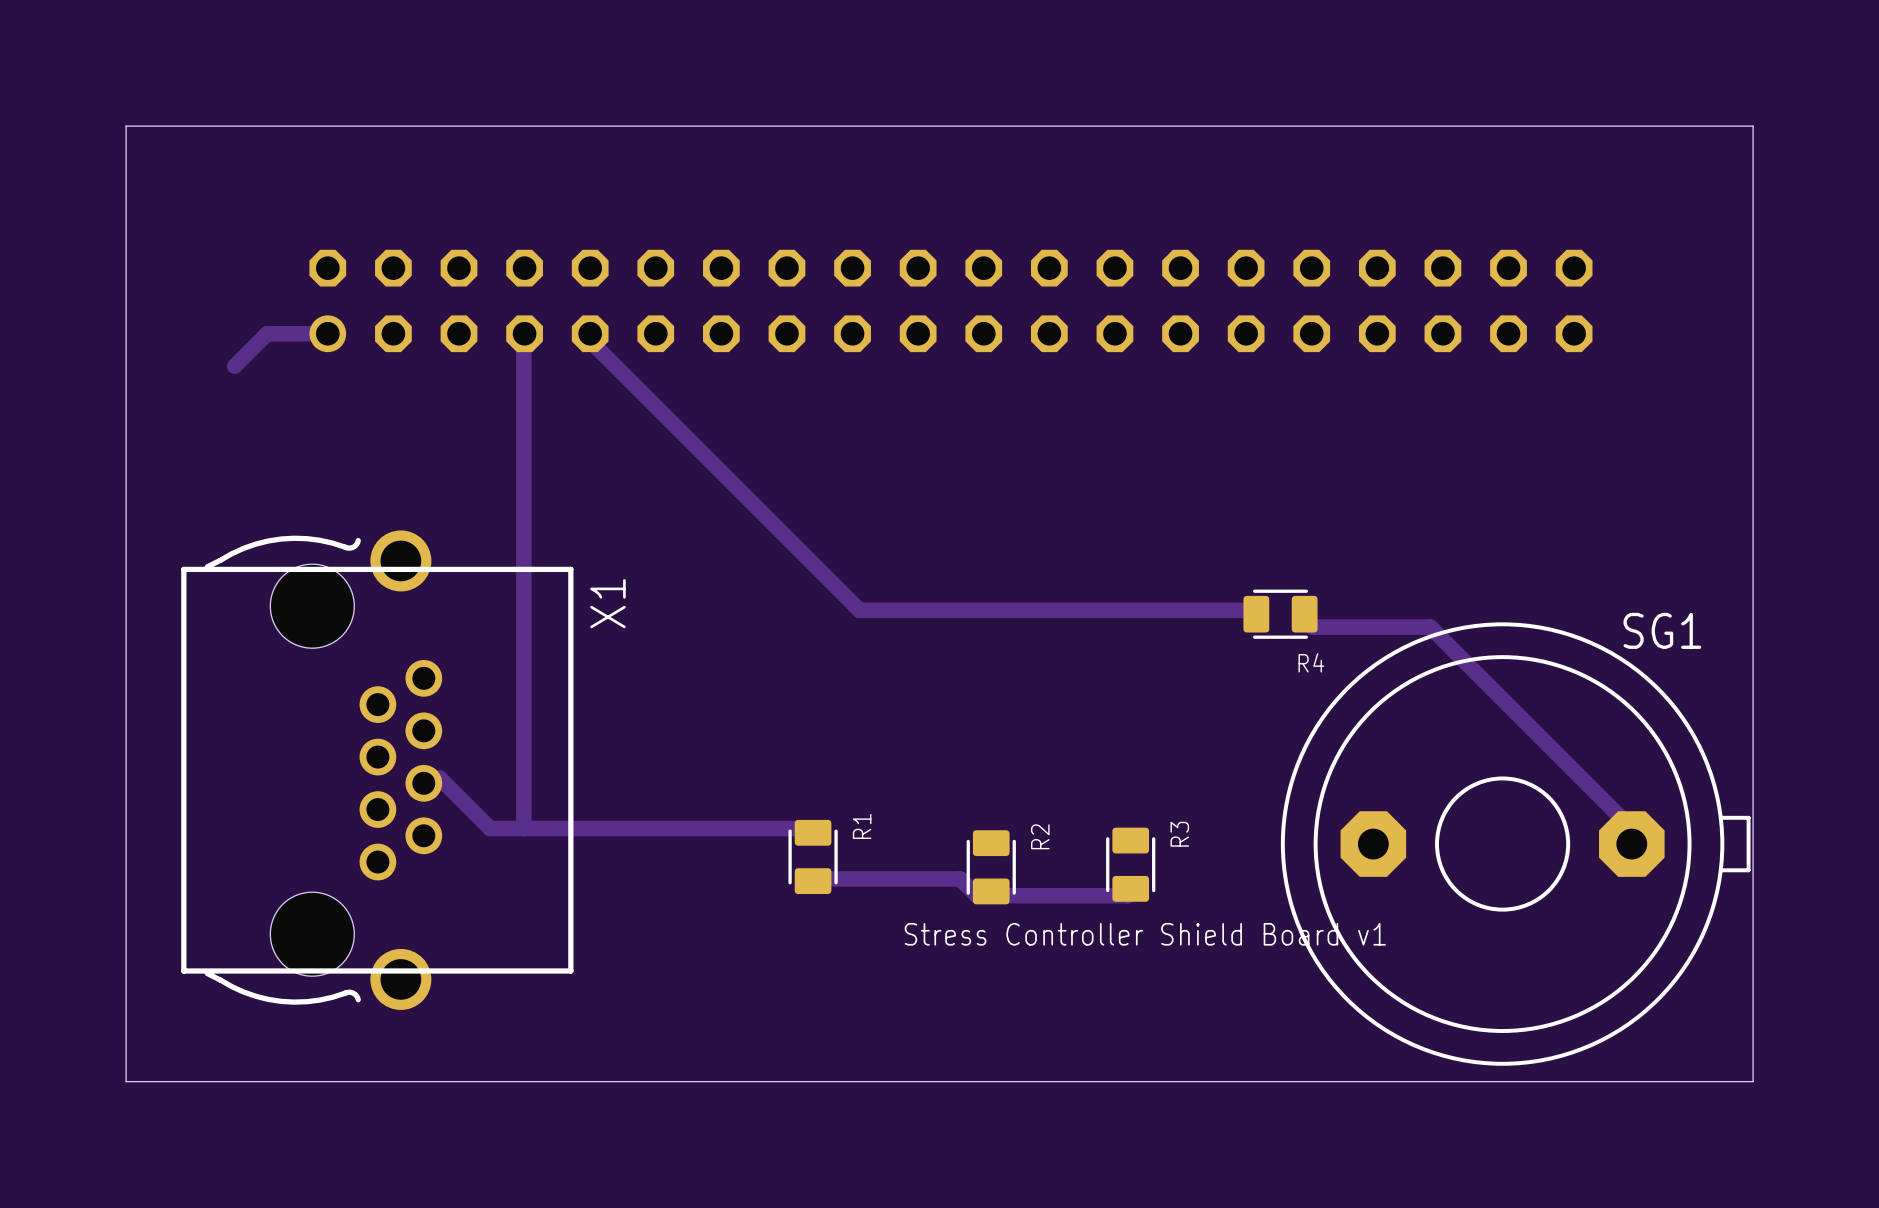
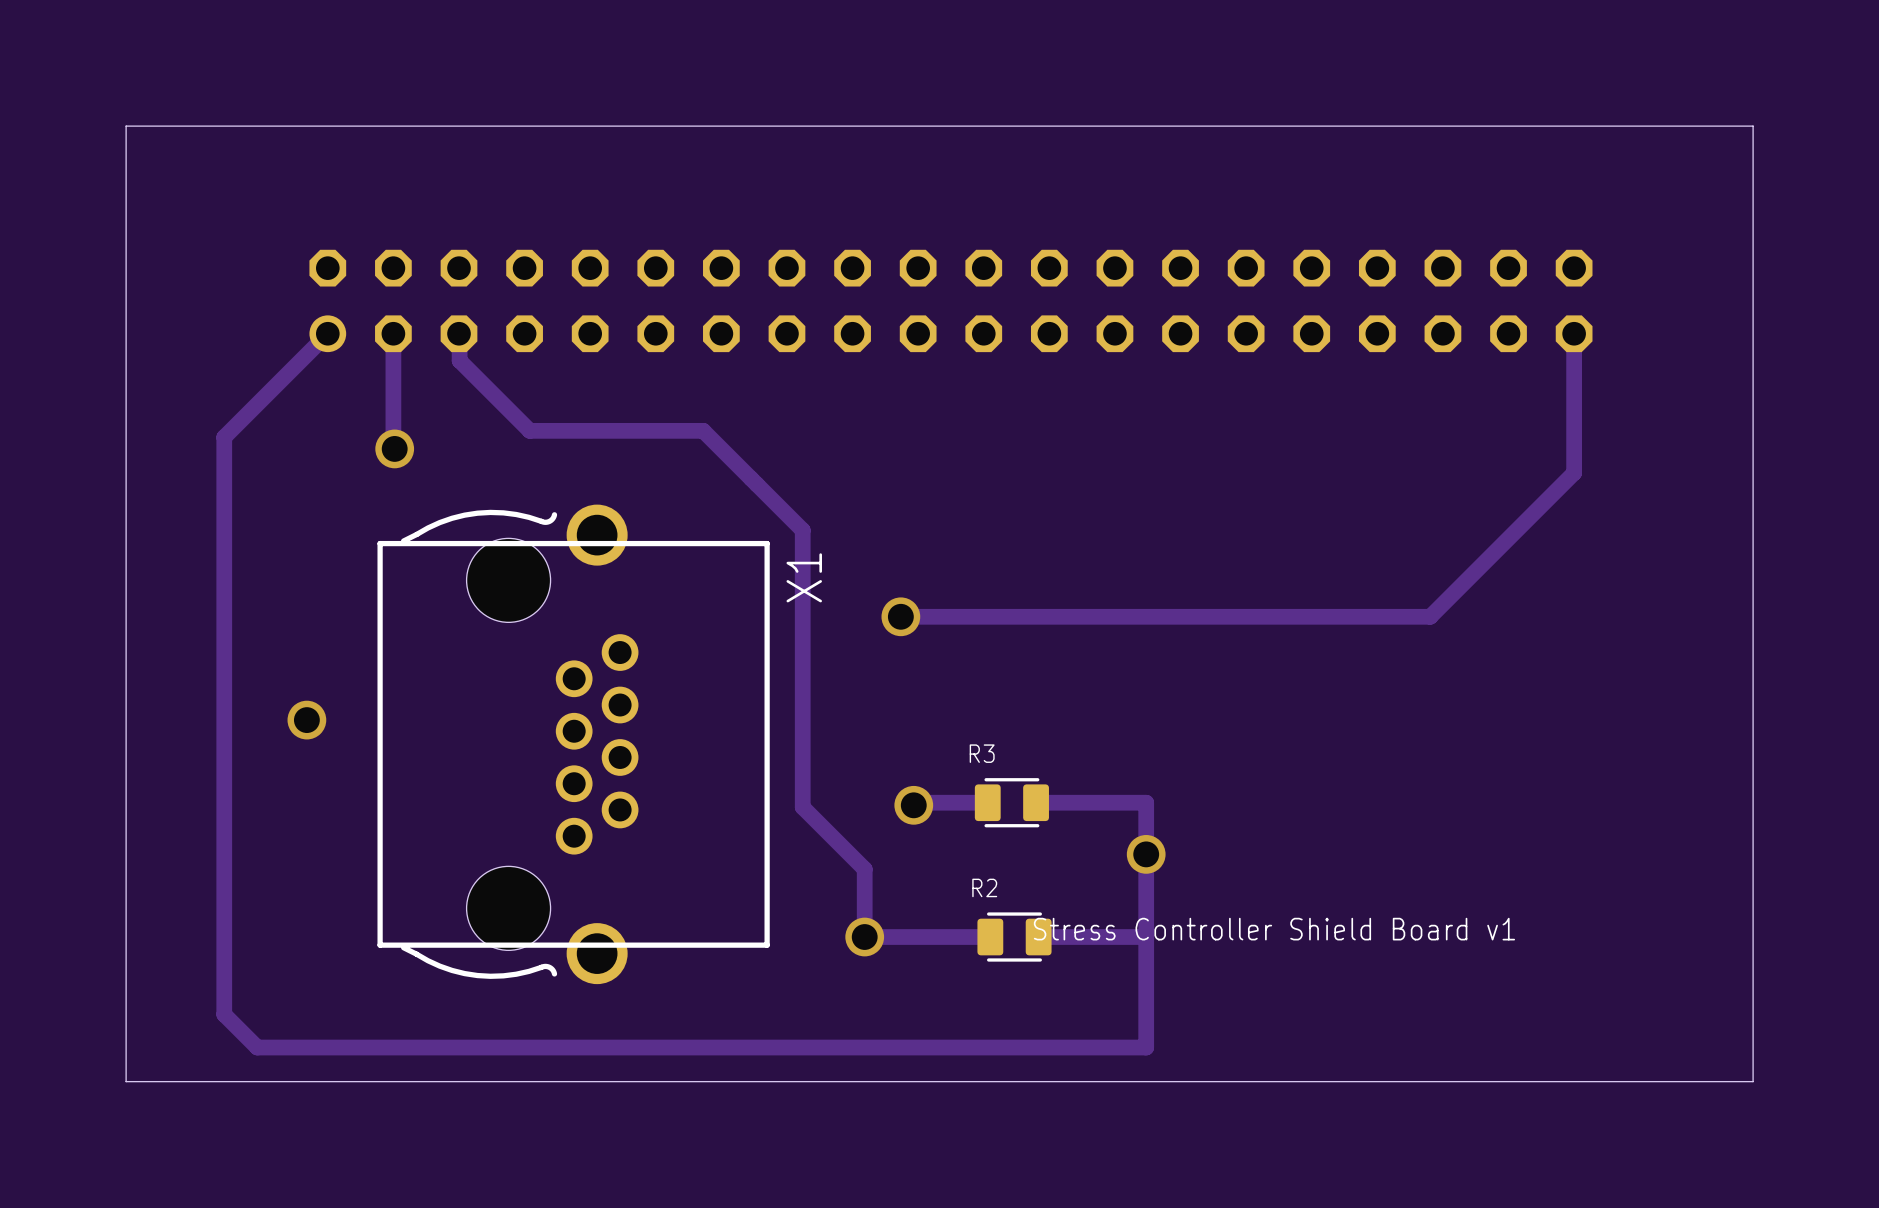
track: (327, 333) (267, 333) (234, 366) -> (327, 333) (224, 437) (224, 1014) (257, 1047) (1146, 1047) (1146, 802) (1036, 802)
track: none -> (394, 333) (394, 448)
track: none -> (459, 333) (459, 360) (529, 430) (703, 430) (802, 530) (802, 807) (864, 869) (864, 937) (990, 937)
track: (524, 333) (523, 828) -> none
track: (590, 333) (590, 341) (859, 610) (1245, 610) (1256, 614) -> none
track: none -> (1574, 333) (1574, 472) (1430, 616) (900, 616)
via: none -> (394, 448)
R4: (1280, 614) -> none
track: (1304, 614) (1312, 627) (1430, 627) (1631, 828) (1631, 844) -> none
via: none -> (900, 616)
via: none -> (306, 720)
X1 position: (377, 770) -> (573, 744)
track: (423, 783) (439, 778) (490, 828) (809, 828) (813, 832) -> none
track: none -> (987, 802) (916, 802) (913, 805)
via: none -> (913, 805)
R3 name position: R3 (1179, 834) -> R3 (982, 753)
R2 name position: R2 (1040, 836) -> R2 (984, 887)
SG1: (1515, 844) -> none
via: none -> (1146, 854)
R1: (813, 856) -> none
R3 rotation: 0° (1130, 864) -> 90° clockwise (1011, 802)
R3 position: (1130, 864) -> (1011, 802)
R2 rotation: 0° (991, 867) -> 90° clockwise (1014, 937)
R2 position: (991, 867) -> (1014, 937)
track: (813, 881) (825, 878) (960, 878) (977, 895) (991, 891) (993, 895) (1128, 895) (1130, 888) -> none
text position: Stress Controller Shield Board v1 (1145, 934) -> Stress Controller Shield Board v1 (1274, 929)
via: none -> (864, 937)
track: none -> (1038, 937) (1146, 937)

